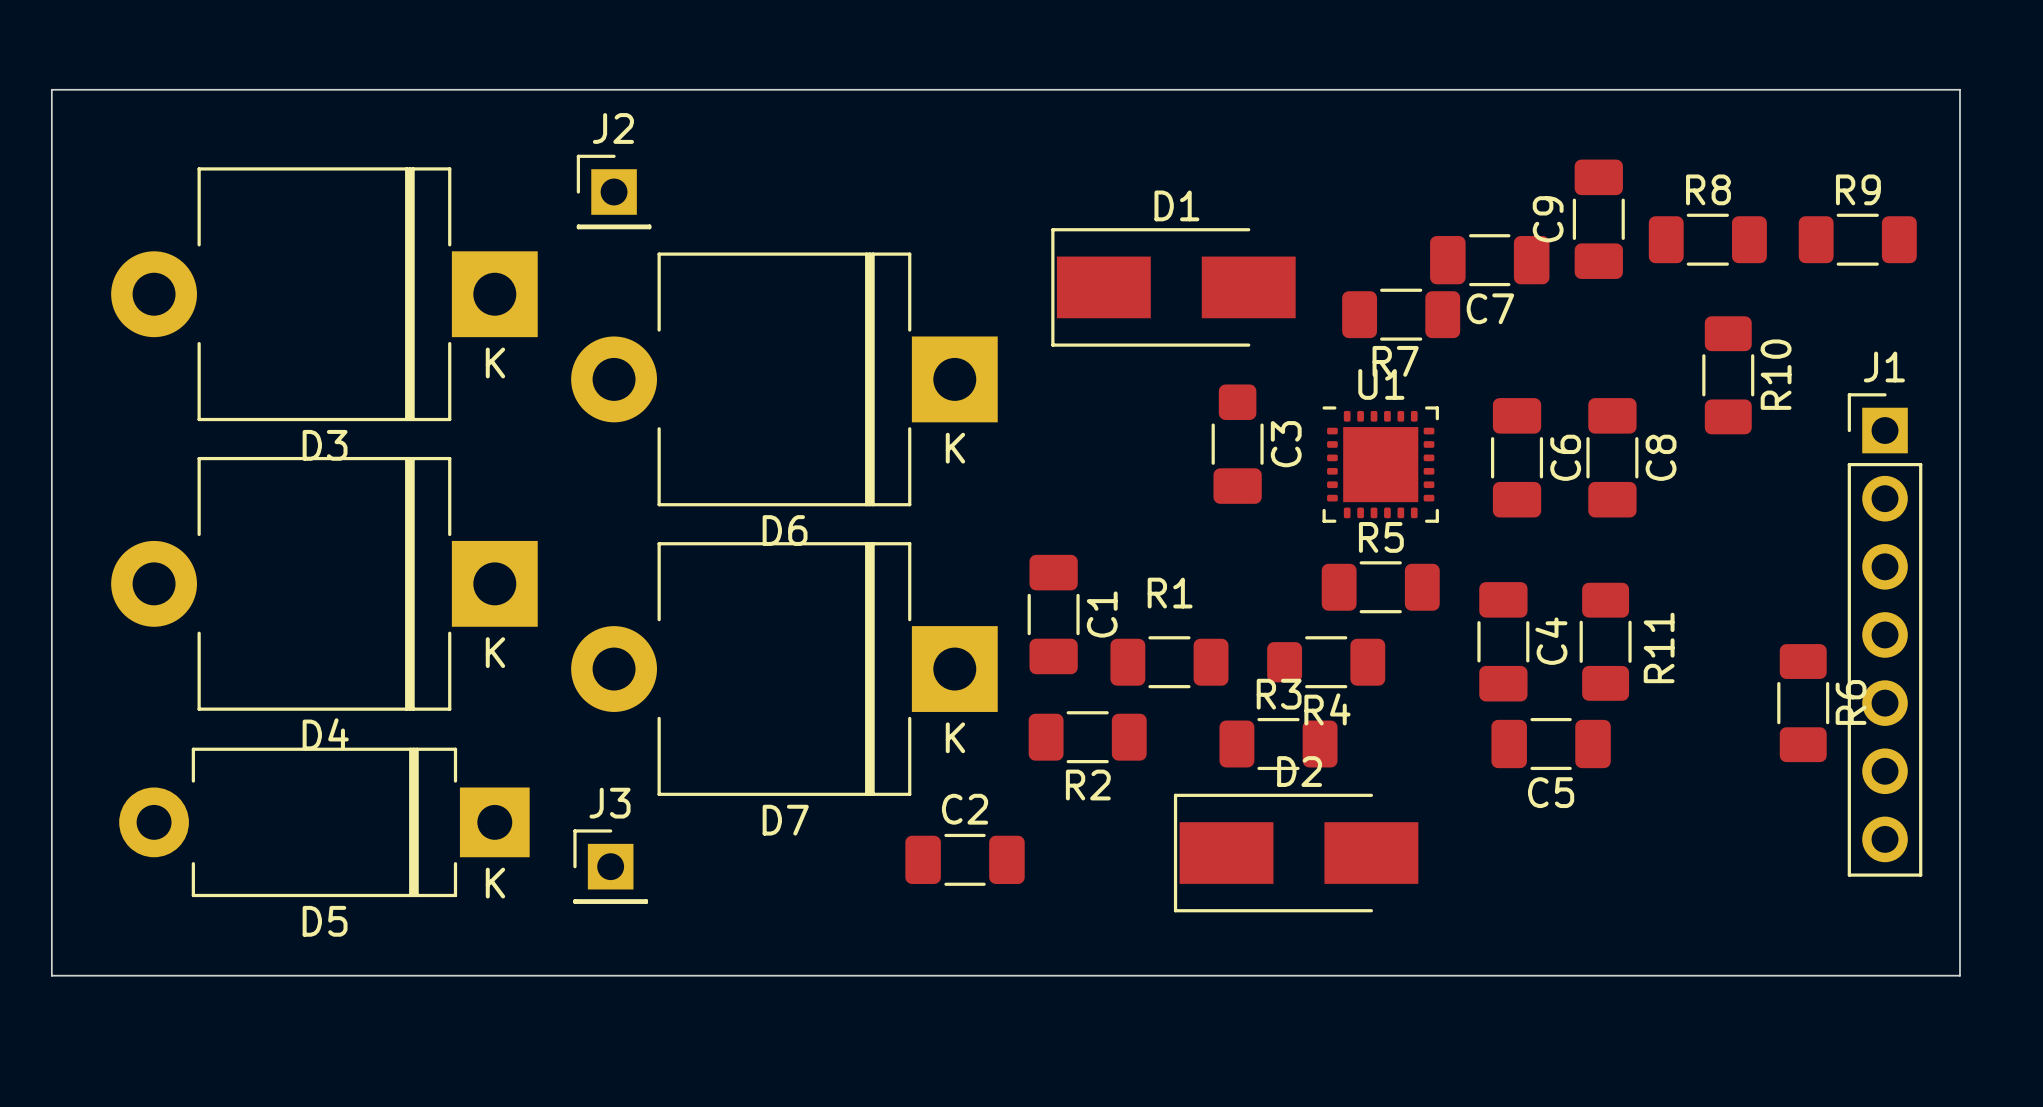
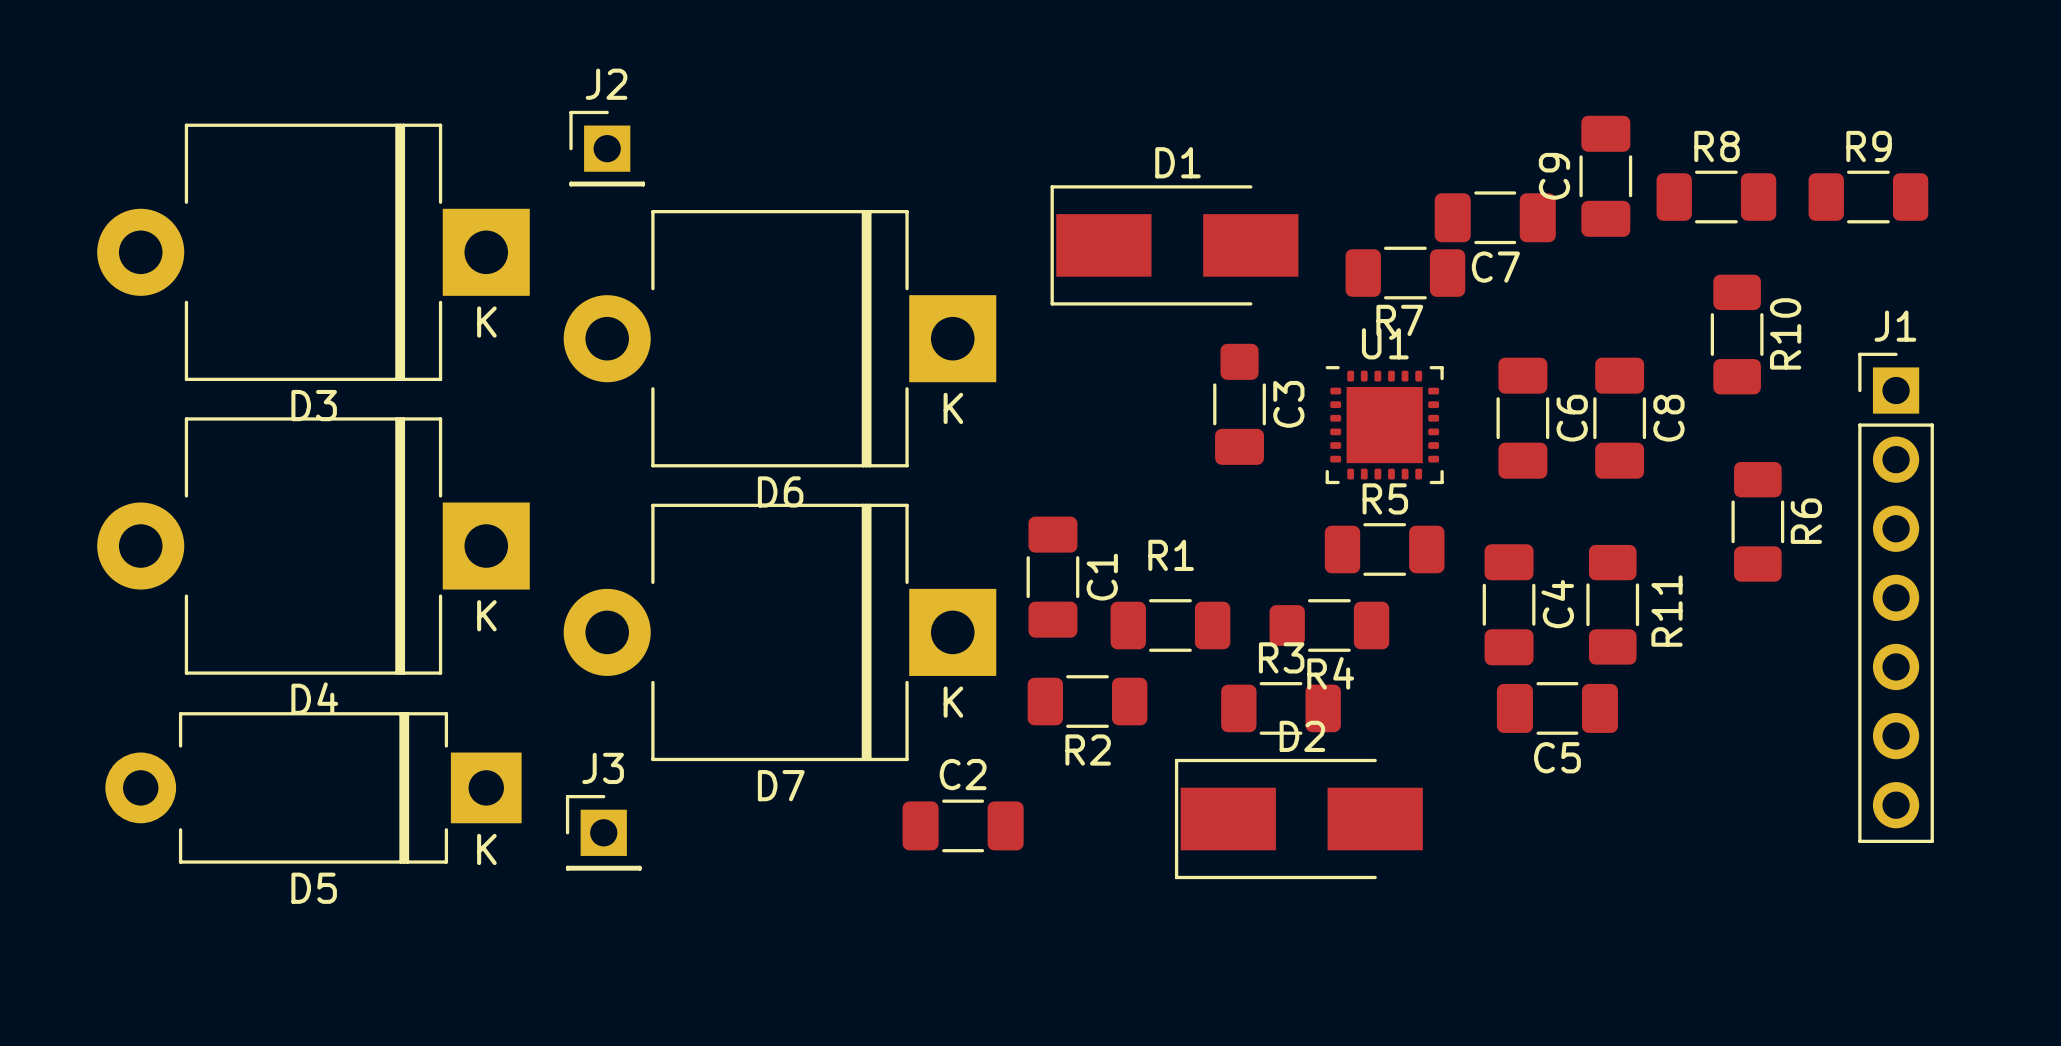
board edge: (51, 89) (51, 975) (1959, 975) (1959, 89) (51, 89) -> none
R6 position: (1803, 703) -> (1757, 521)

